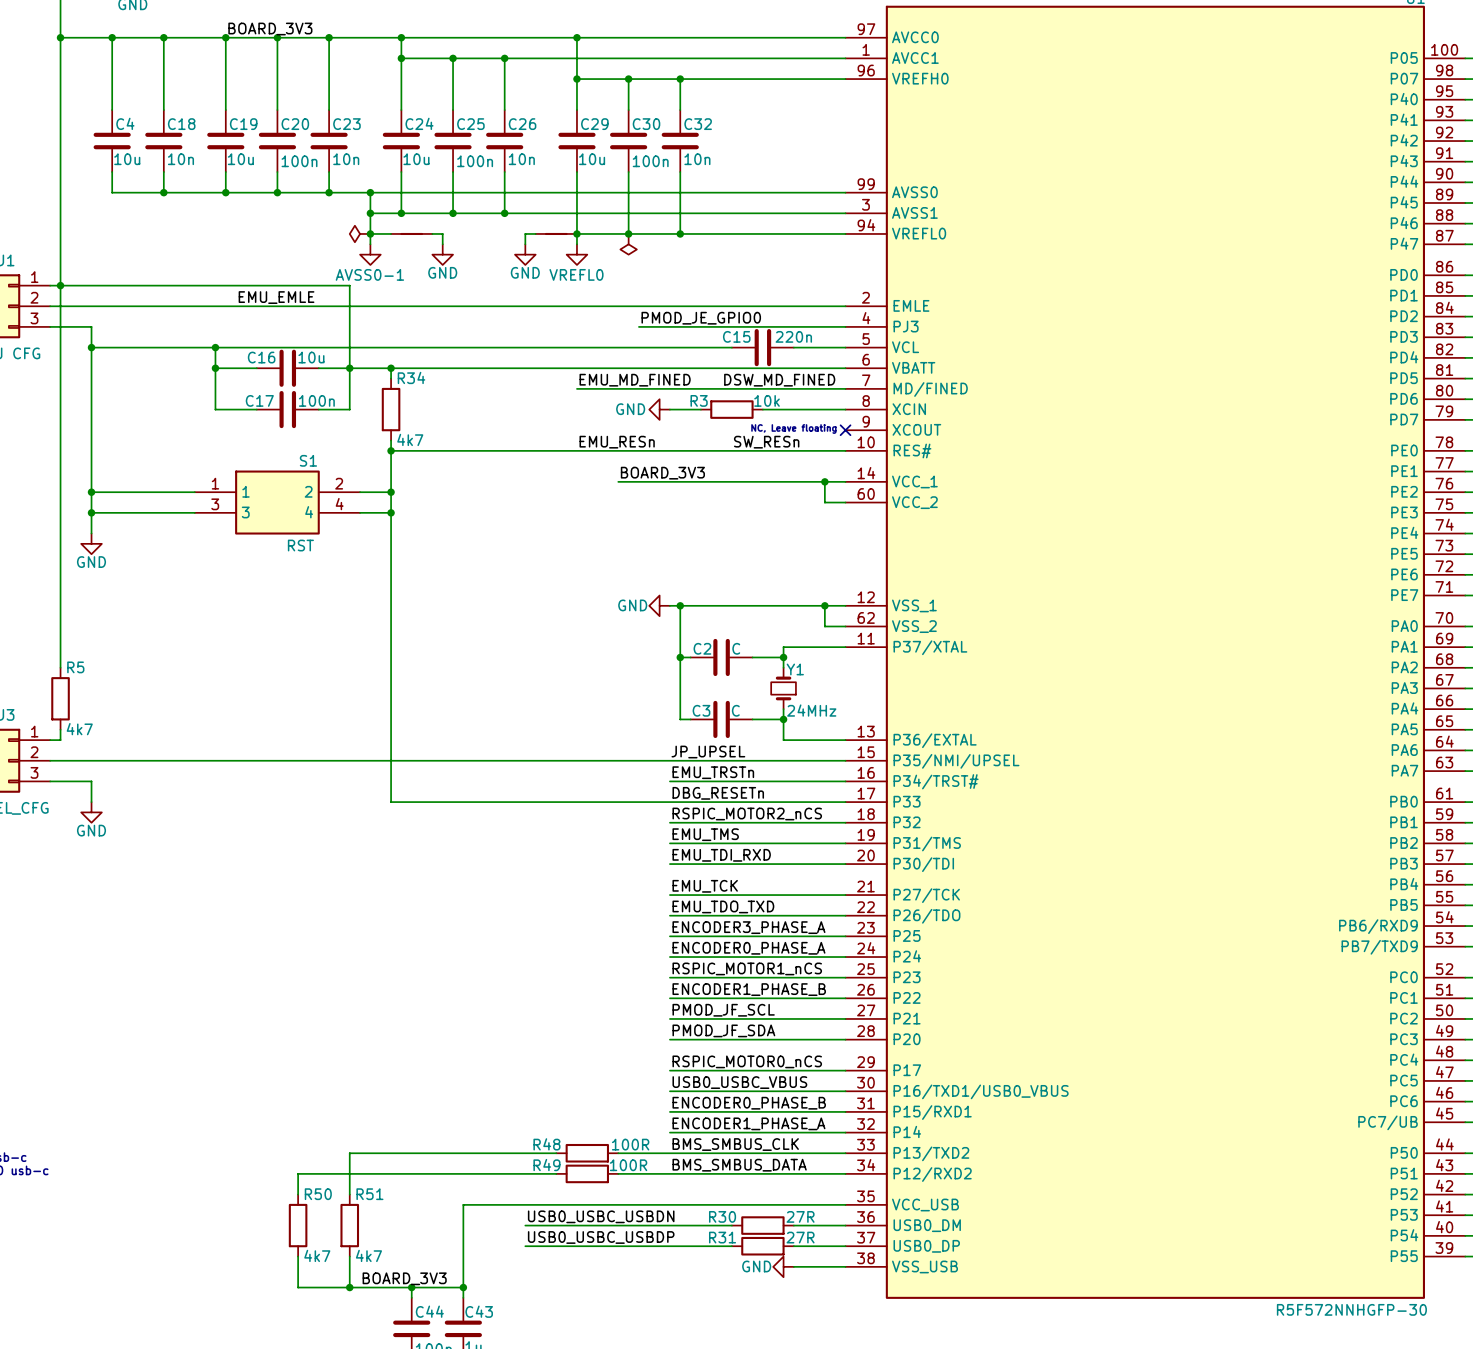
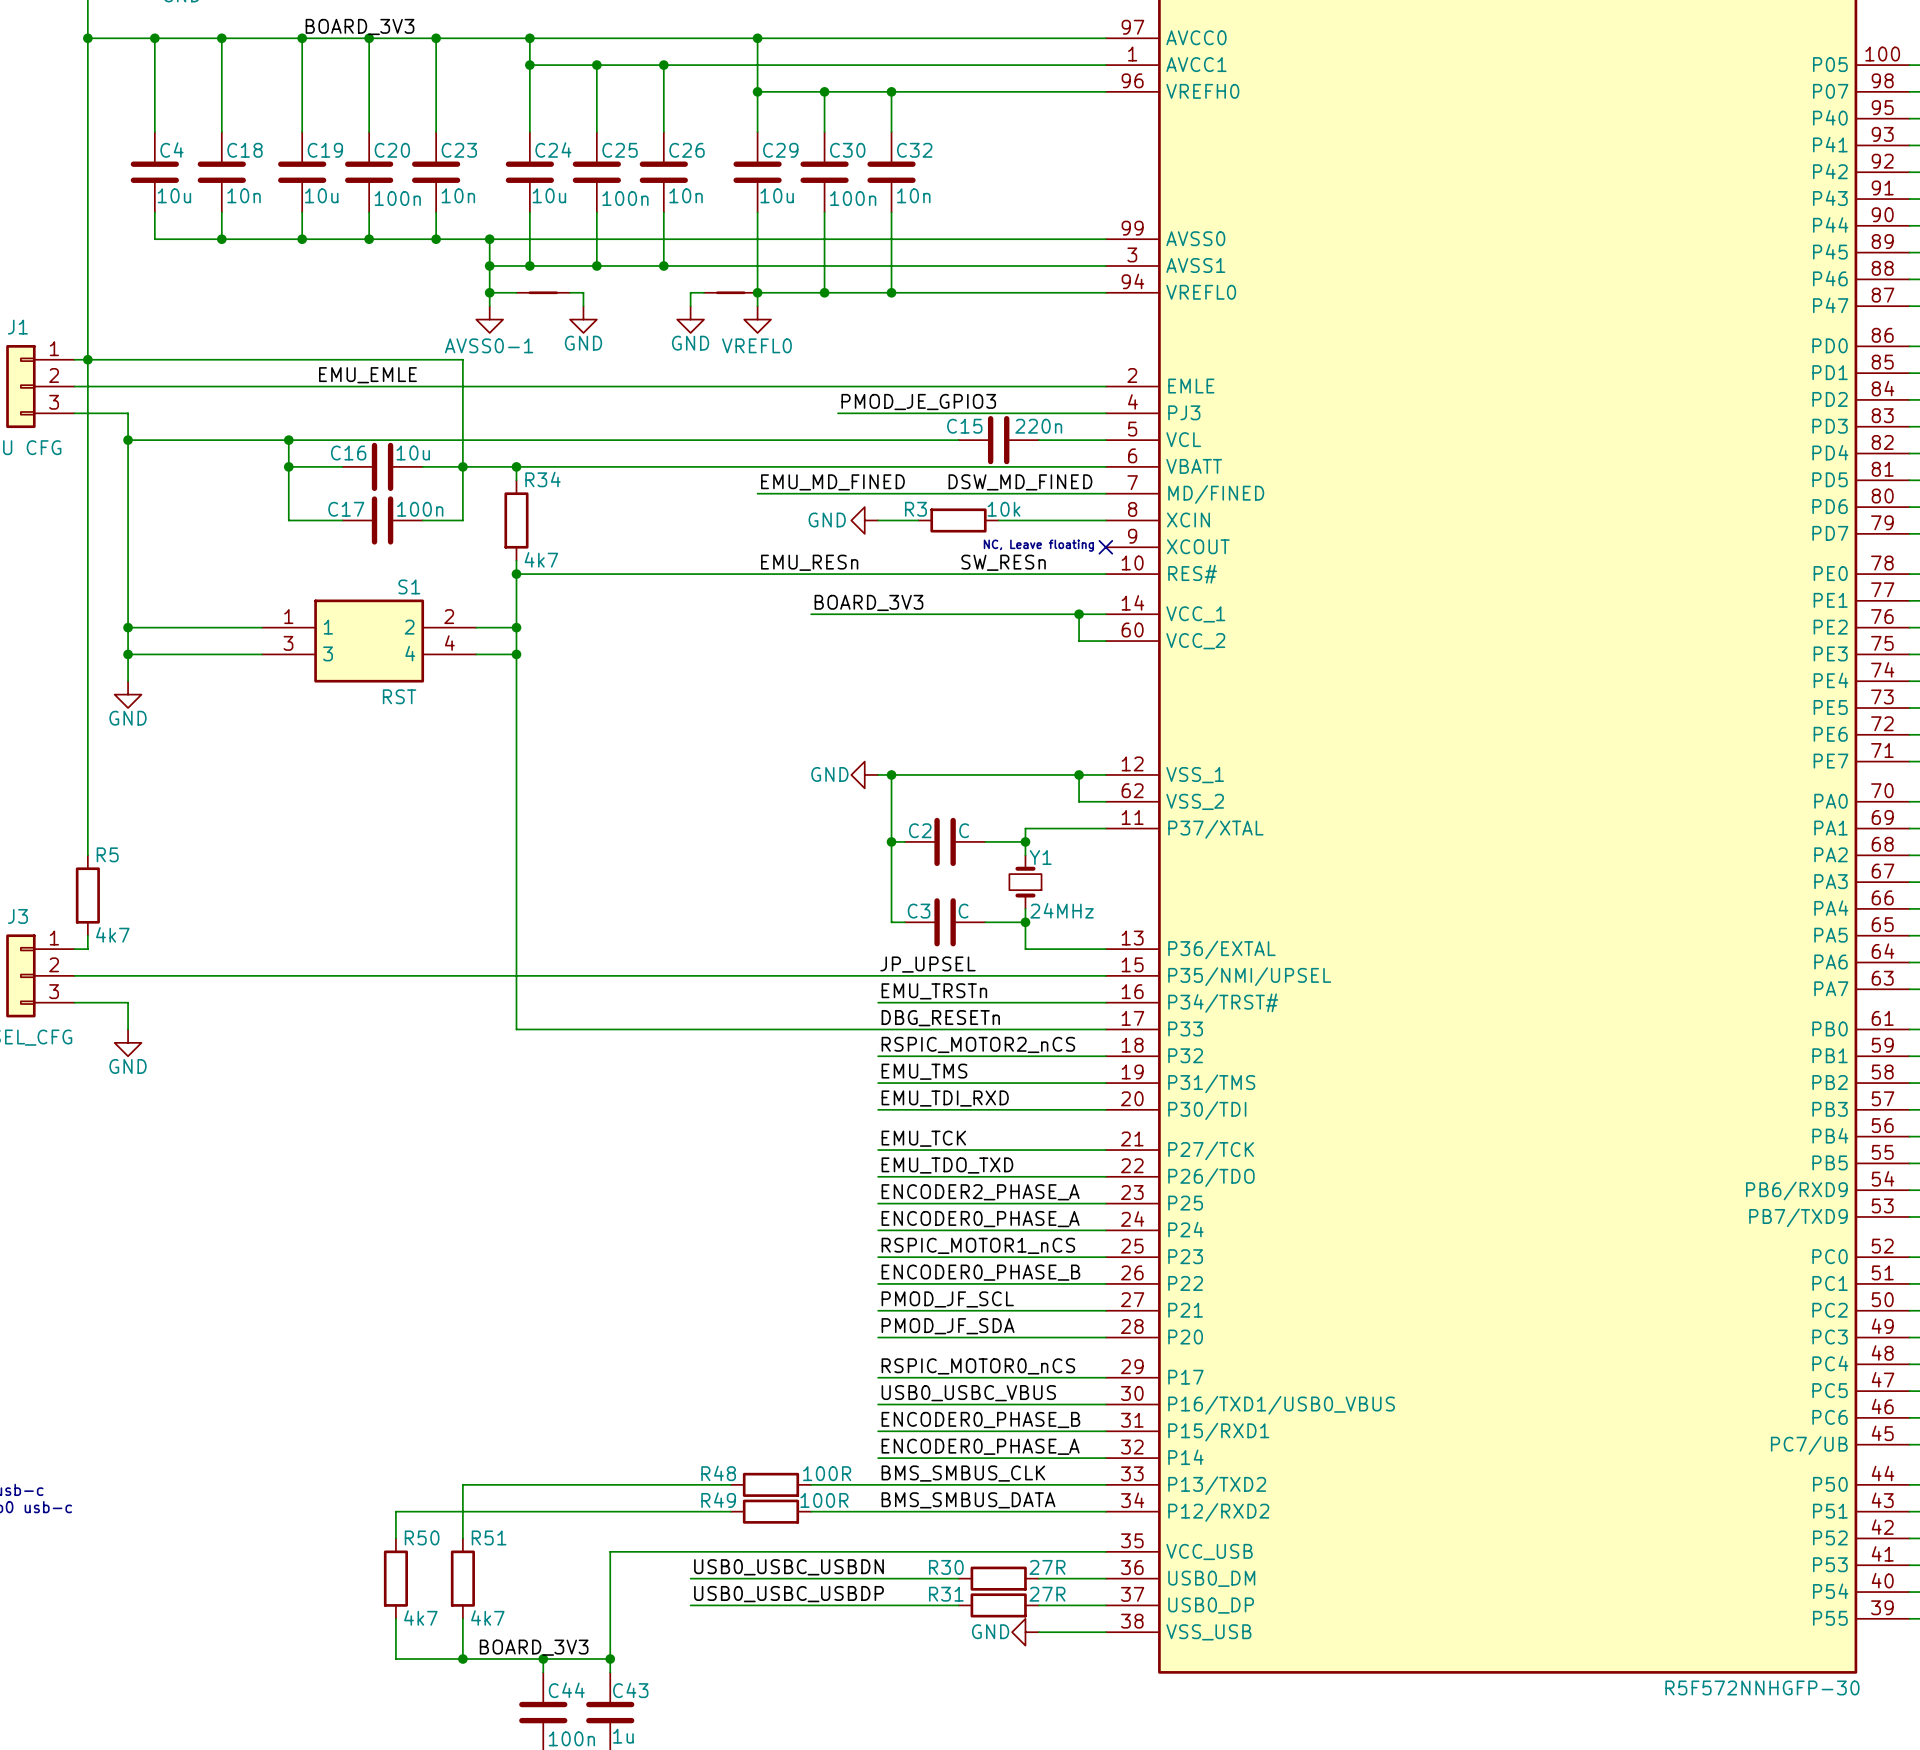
power symbol: (360, 233) -> none
power symbol: (628, 244) -> none
label: PMOD_JE_GPIO0 (701, 318) -> PMOD_JE_GPIO3 (918, 402)
label: ENCODER3_PHASE_A (748, 927) -> ENCODER2_PHASE_A (980, 1192)
label: ENCODER1_PHASE_B (749, 989) -> ENCODER0_PHASE_B (980, 1272)
label: ENCODER1_PHASE_A (748, 1123) -> ENCODER0_PHASE_A (980, 1446)

